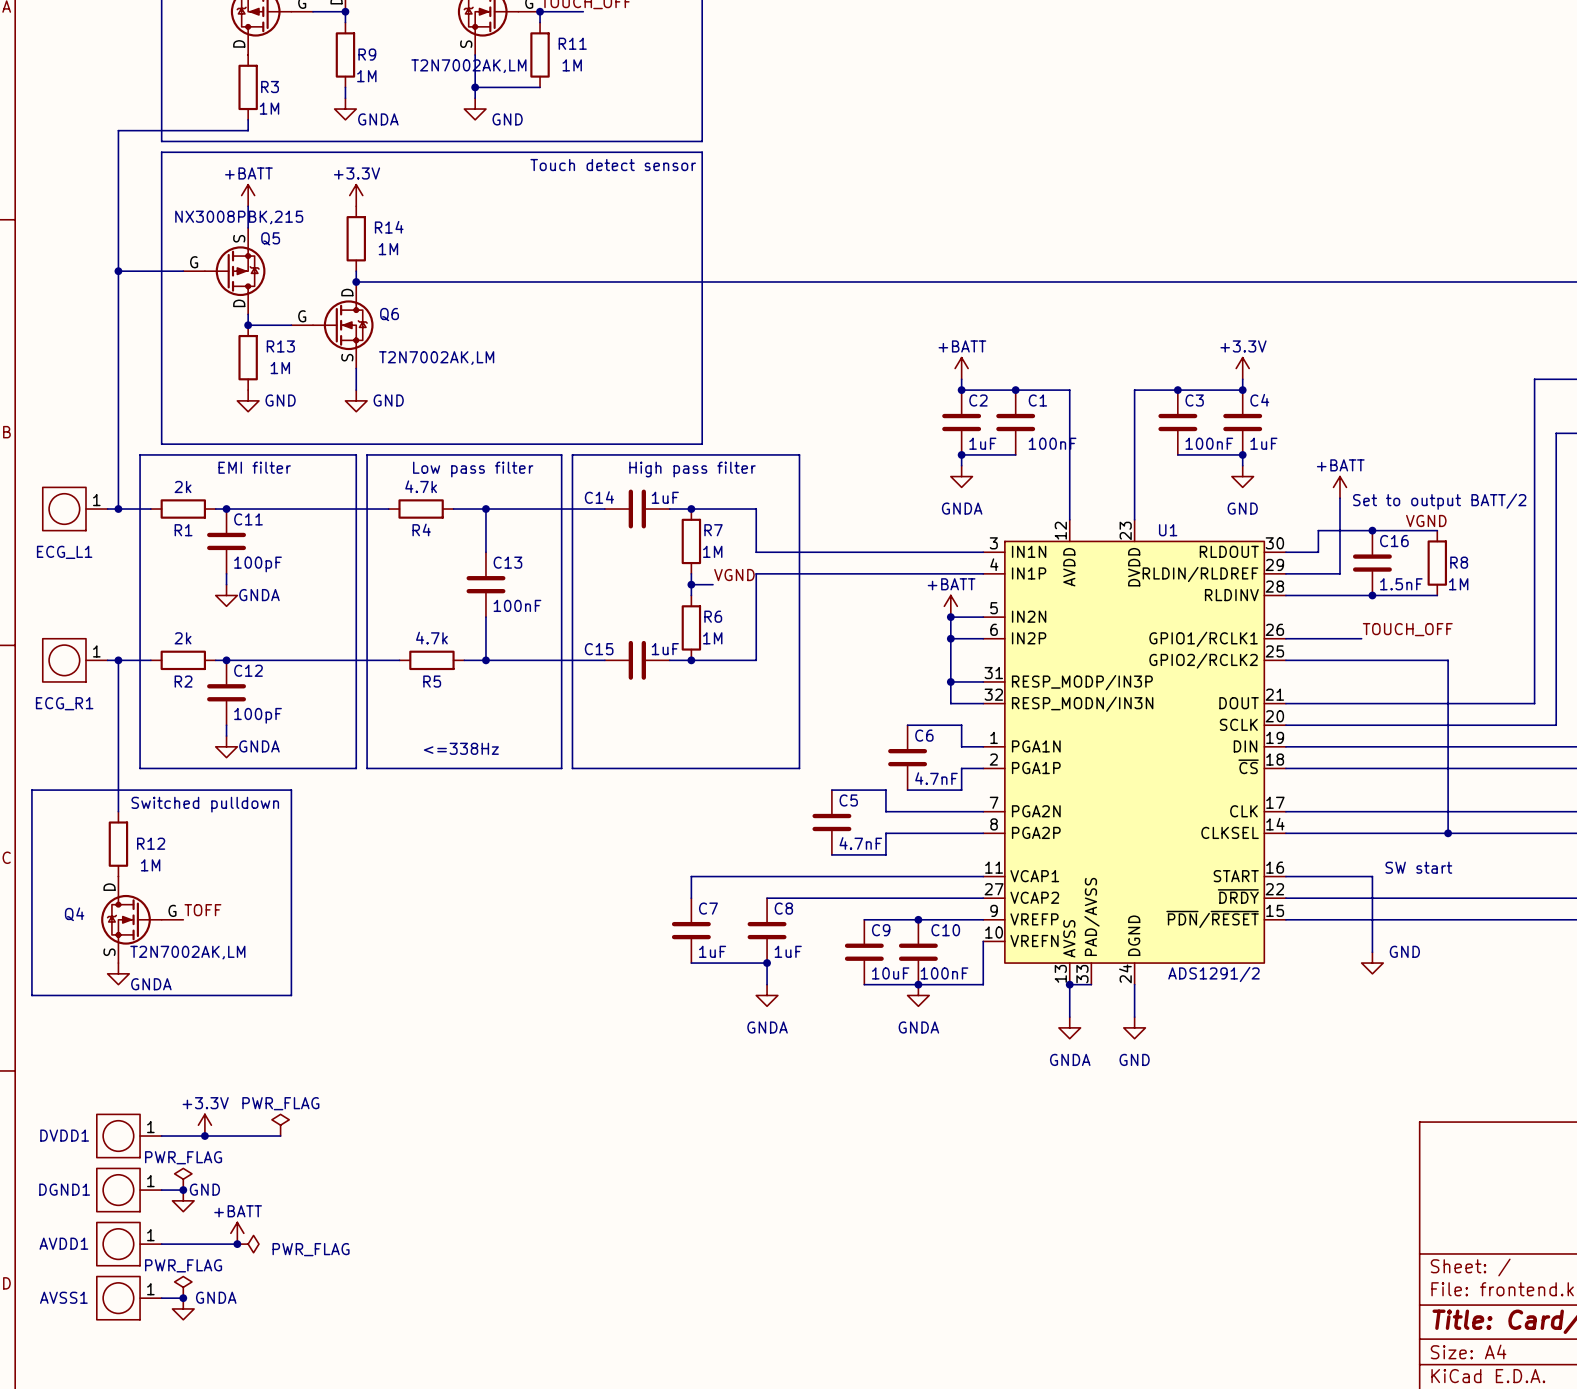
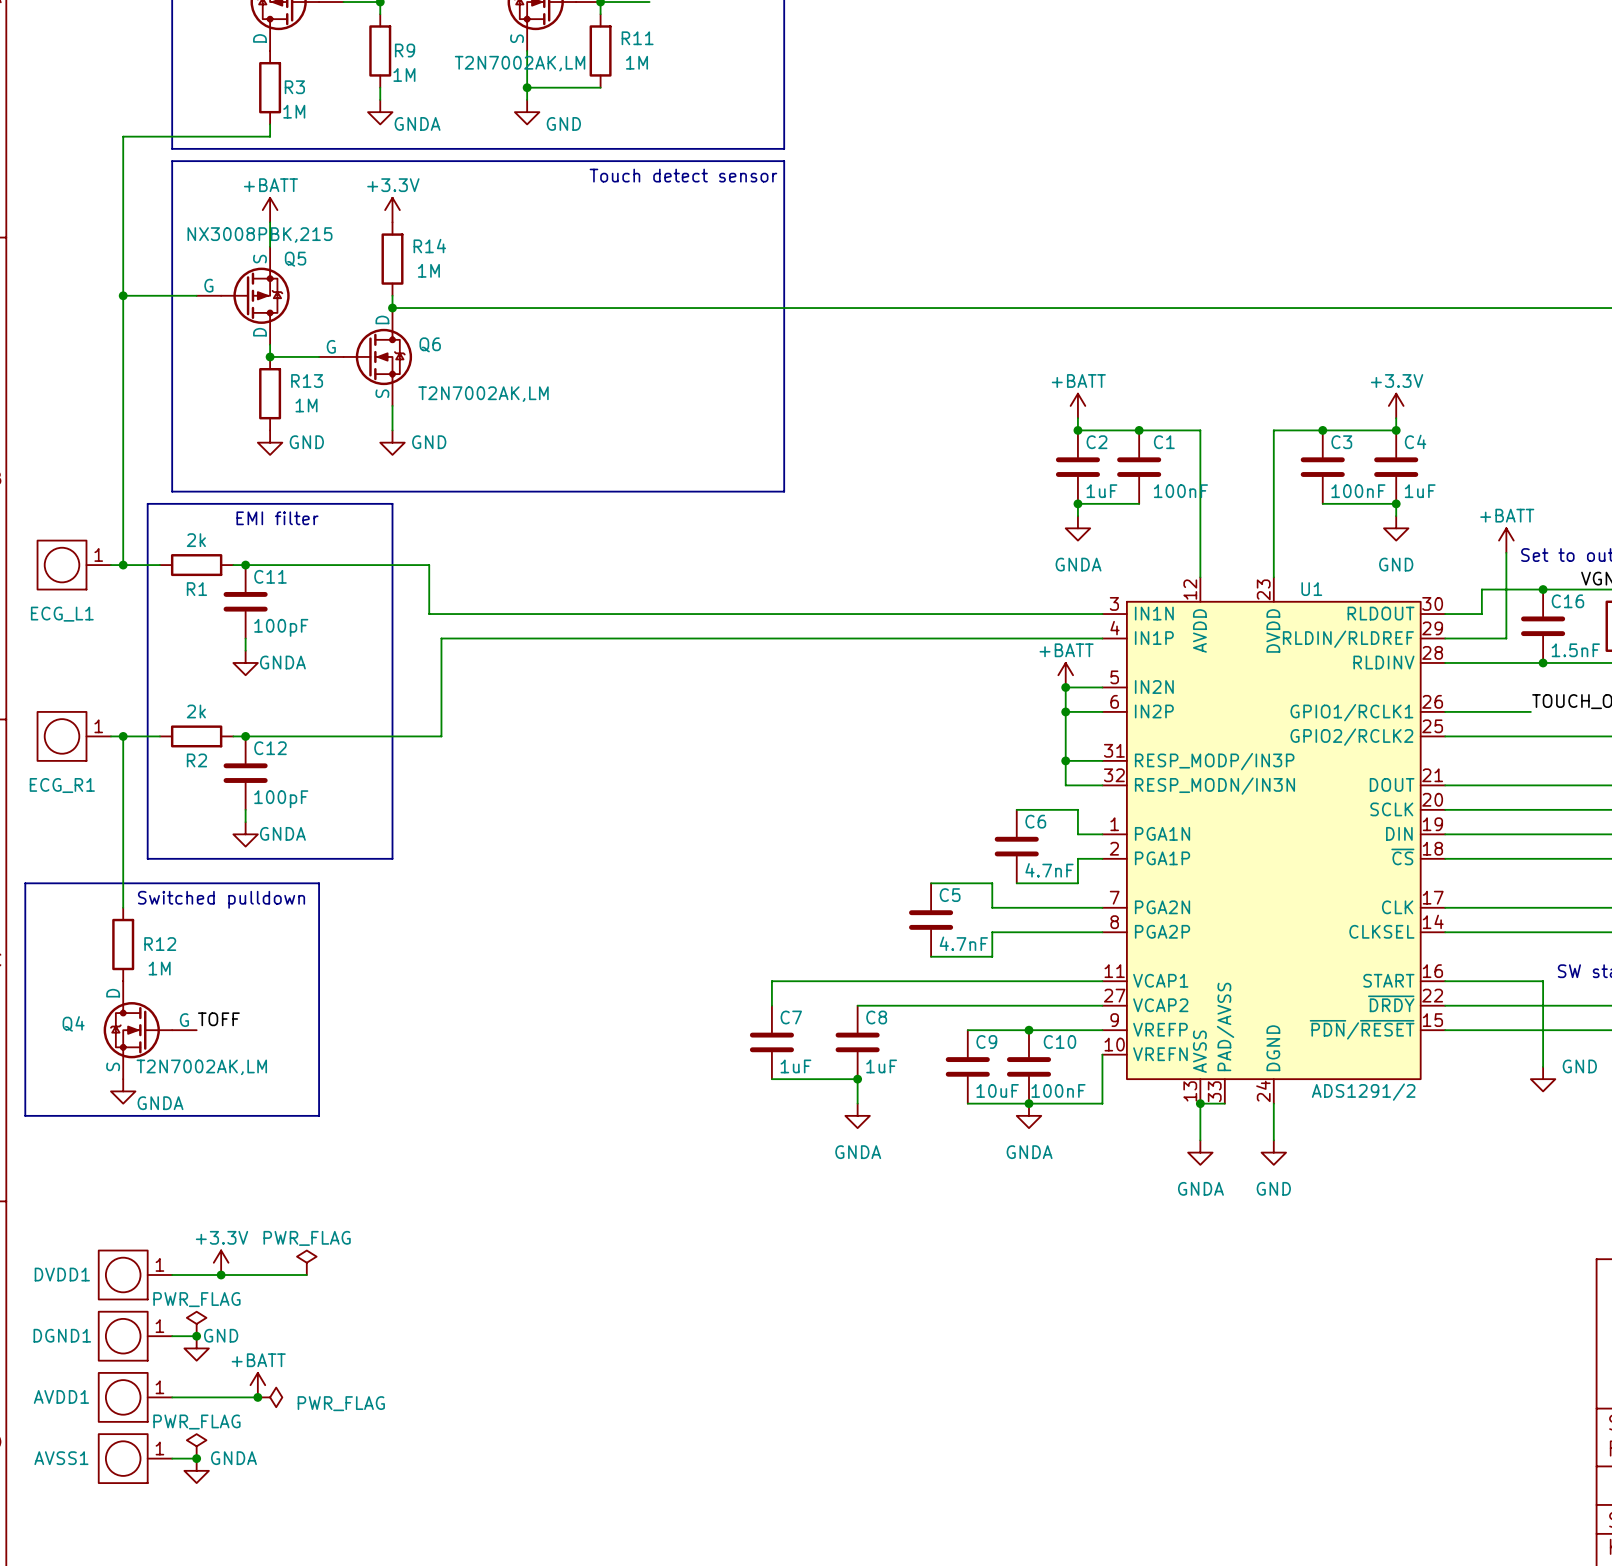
line: (367, 454) (561, 454) (561, 768) (367, 768) (367, 454) -> none
line: (572, 454) (799, 454) (799, 768) (572, 768) (572, 454) -> none
text: Low pass filter (473, 469) -> none
text: High pass filter (692, 469) -> none
R4: 4.7k (421, 509) -> none
wire: (453, 509) (604, 509) -> none
wire: (485, 509) (485, 552) -> none
junction: (485, 509) -> none
C14: 1uF (637, 509) -> none
wire: (669, 509) (756, 509) (756, 552) -> (429, 565) (429, 614) (845, 614)
junction: (691, 509) -> none
R7: 1M (691, 541) -> none
wire: (691, 573) (691, 595) -> none
wire: (756, 573) (756, 660) (669, 660) -> (845, 638) (441, 638) (441, 736)
label: VGND (734, 575) -> none
C13: 100nF (485, 584) -> none
wire: (691, 584) (713, 584) -> none
junction: (691, 584) -> none
wire: (485, 617) (485, 660) -> none
R6: 1M (691, 627) -> none
R5: 4.7k (431, 660) -> none
wire: (464, 660) (604, 660) -> none
junction: (485, 660) -> none
C15: 1uF (637, 660) -> none
junction: (691, 660) -> none
text: <=338Hz (461, 748) -> none

